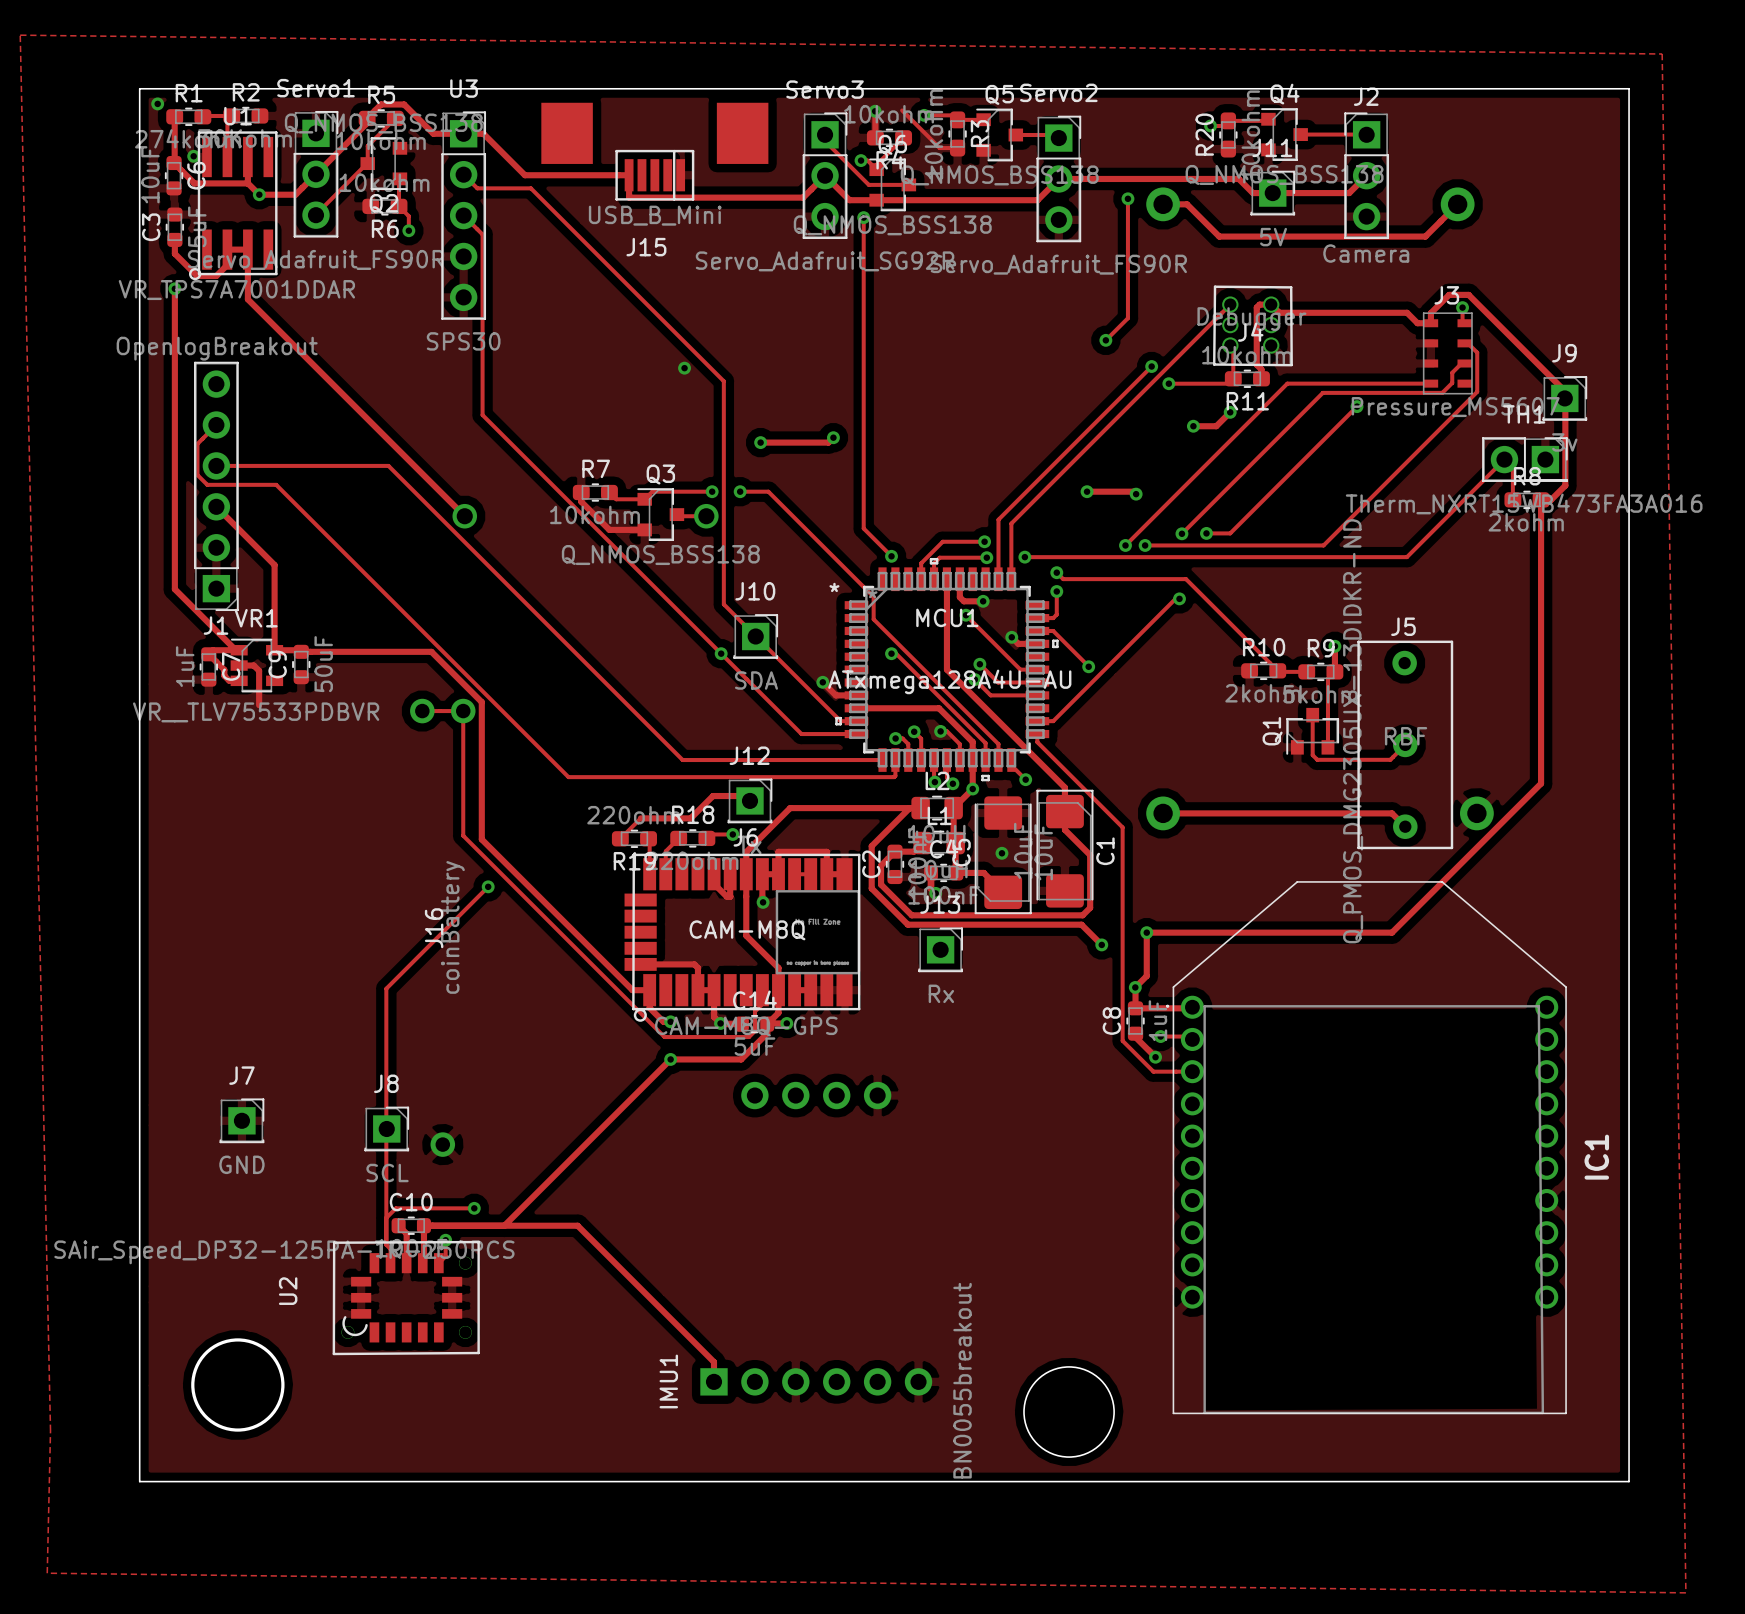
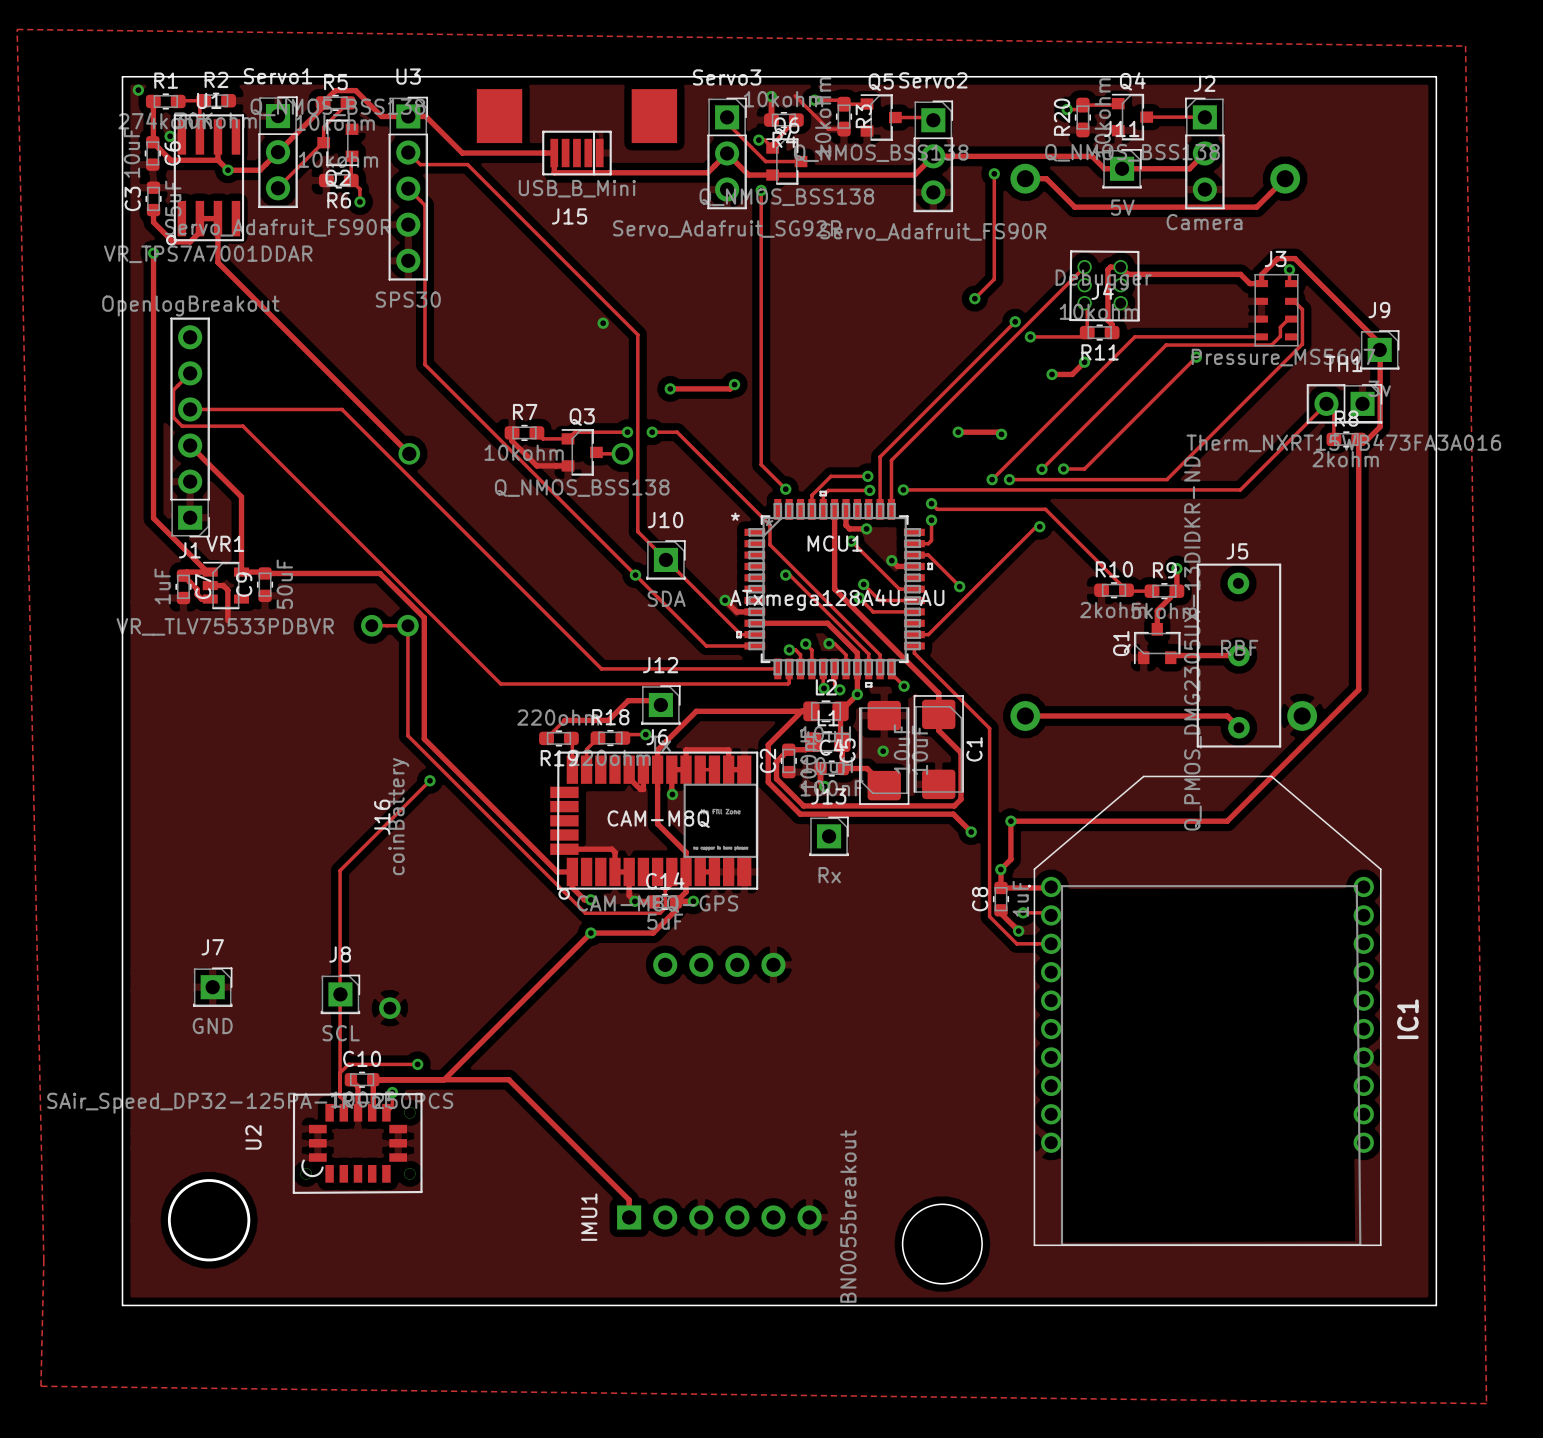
track: (1327, 678) (1327, 747) -> (1170, 597) (1157, 610) (1157, 629)
track: (1312, 715) (1312, 755) (1317, 759) (1390, 759) (1405, 744) -> (1172, 655) (1238, 655)

